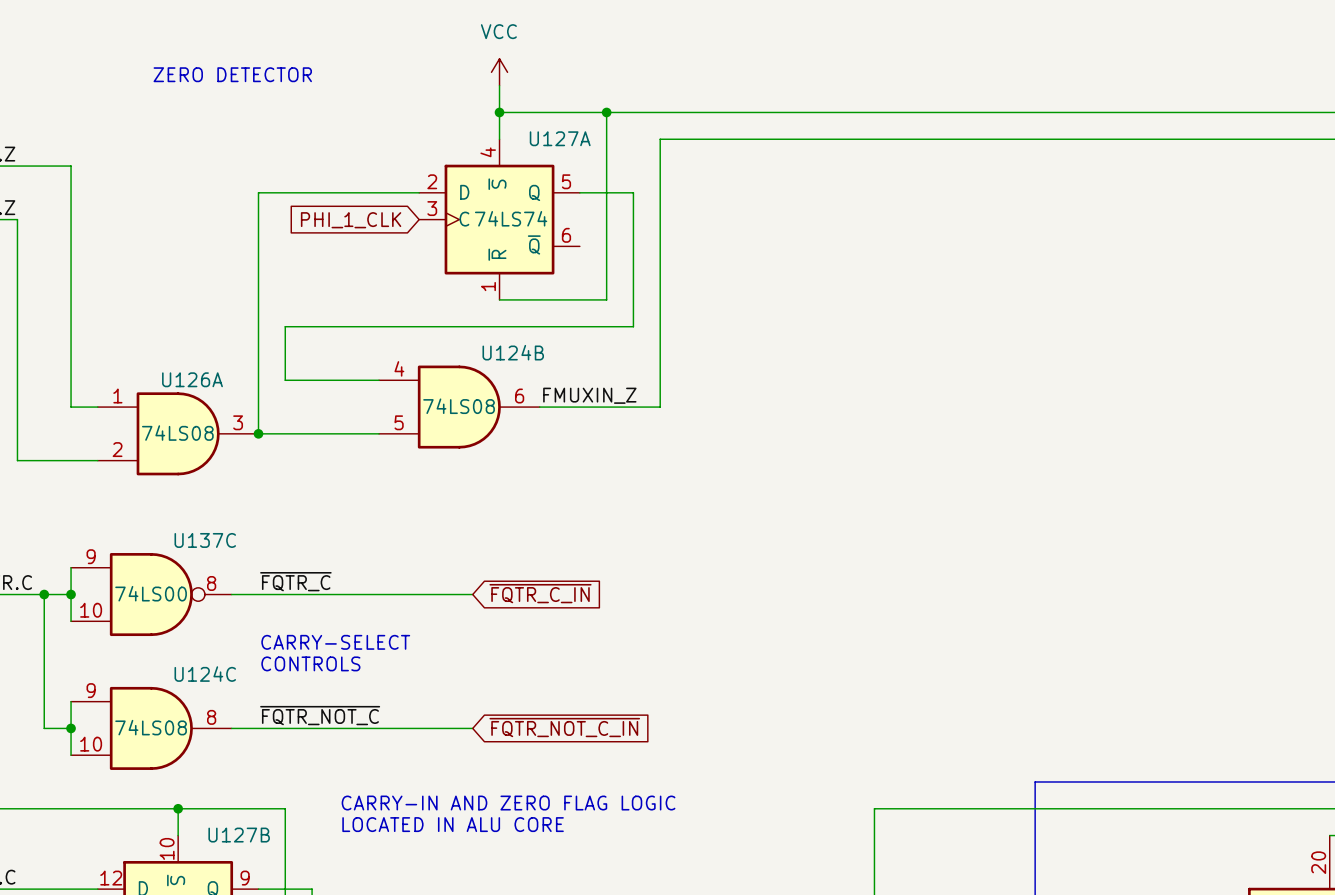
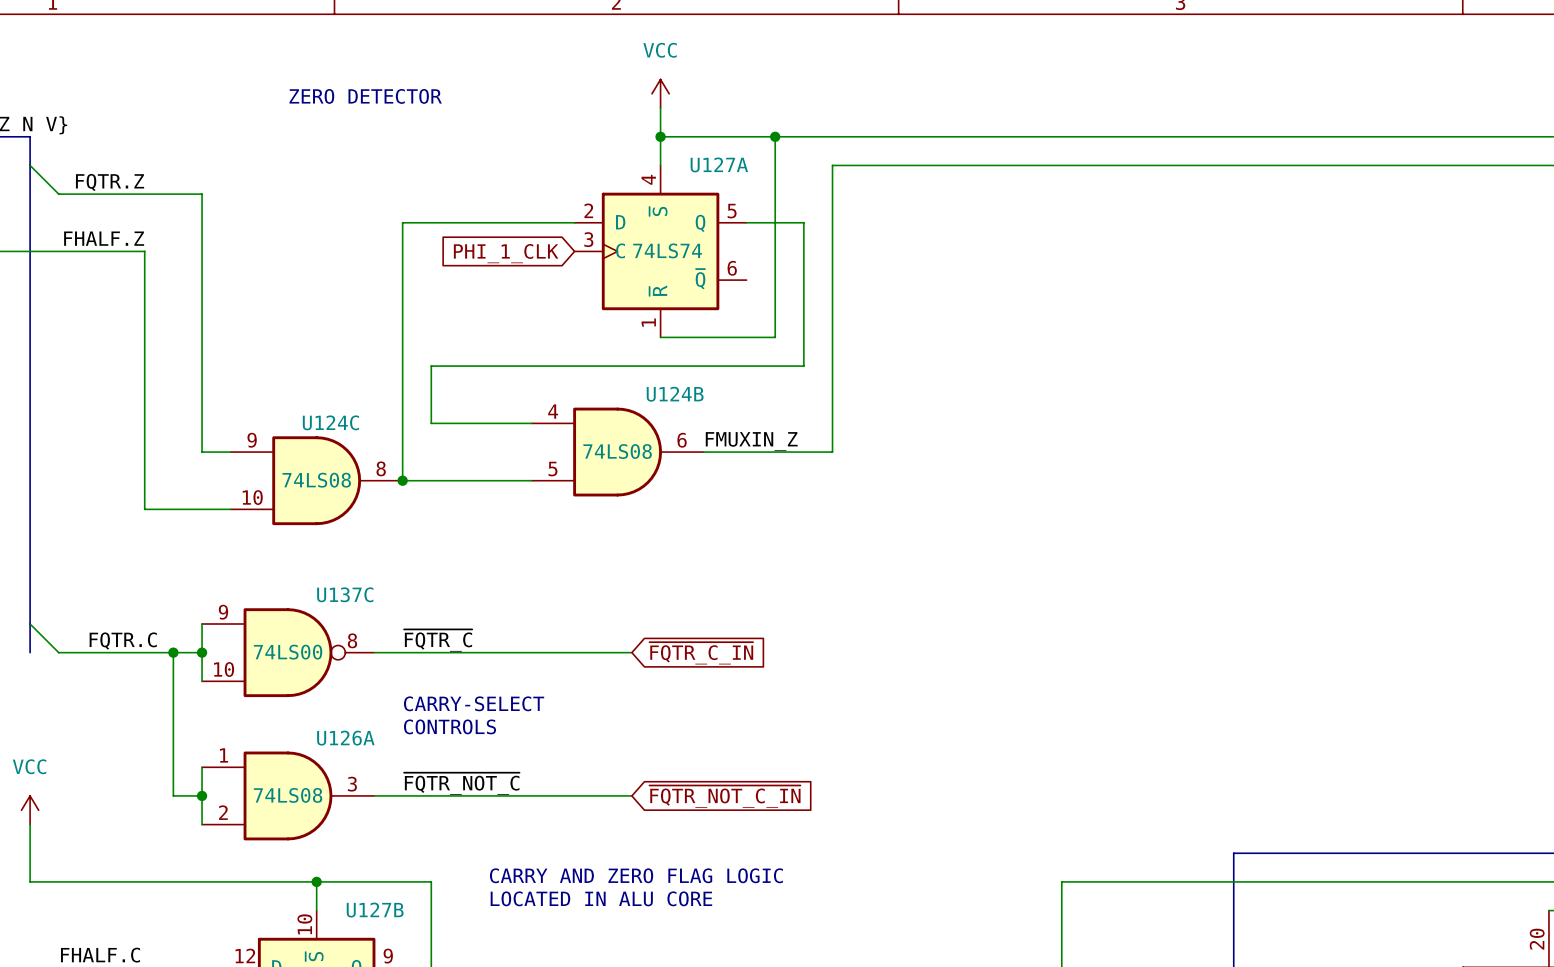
U126A name position: U126A (192, 379) -> U126A (345, 738)
U126A position: (178, 433) -> (288, 795)
U124C name position: U124C (205, 674) -> U124C (330, 422)
U124C position: (151, 728) -> (316, 480)
text: CARRY-IN AND ZERO FLAG LOGIC (508, 803) -> CARRY AND ZERO FLAG LOGIC (636, 875)

